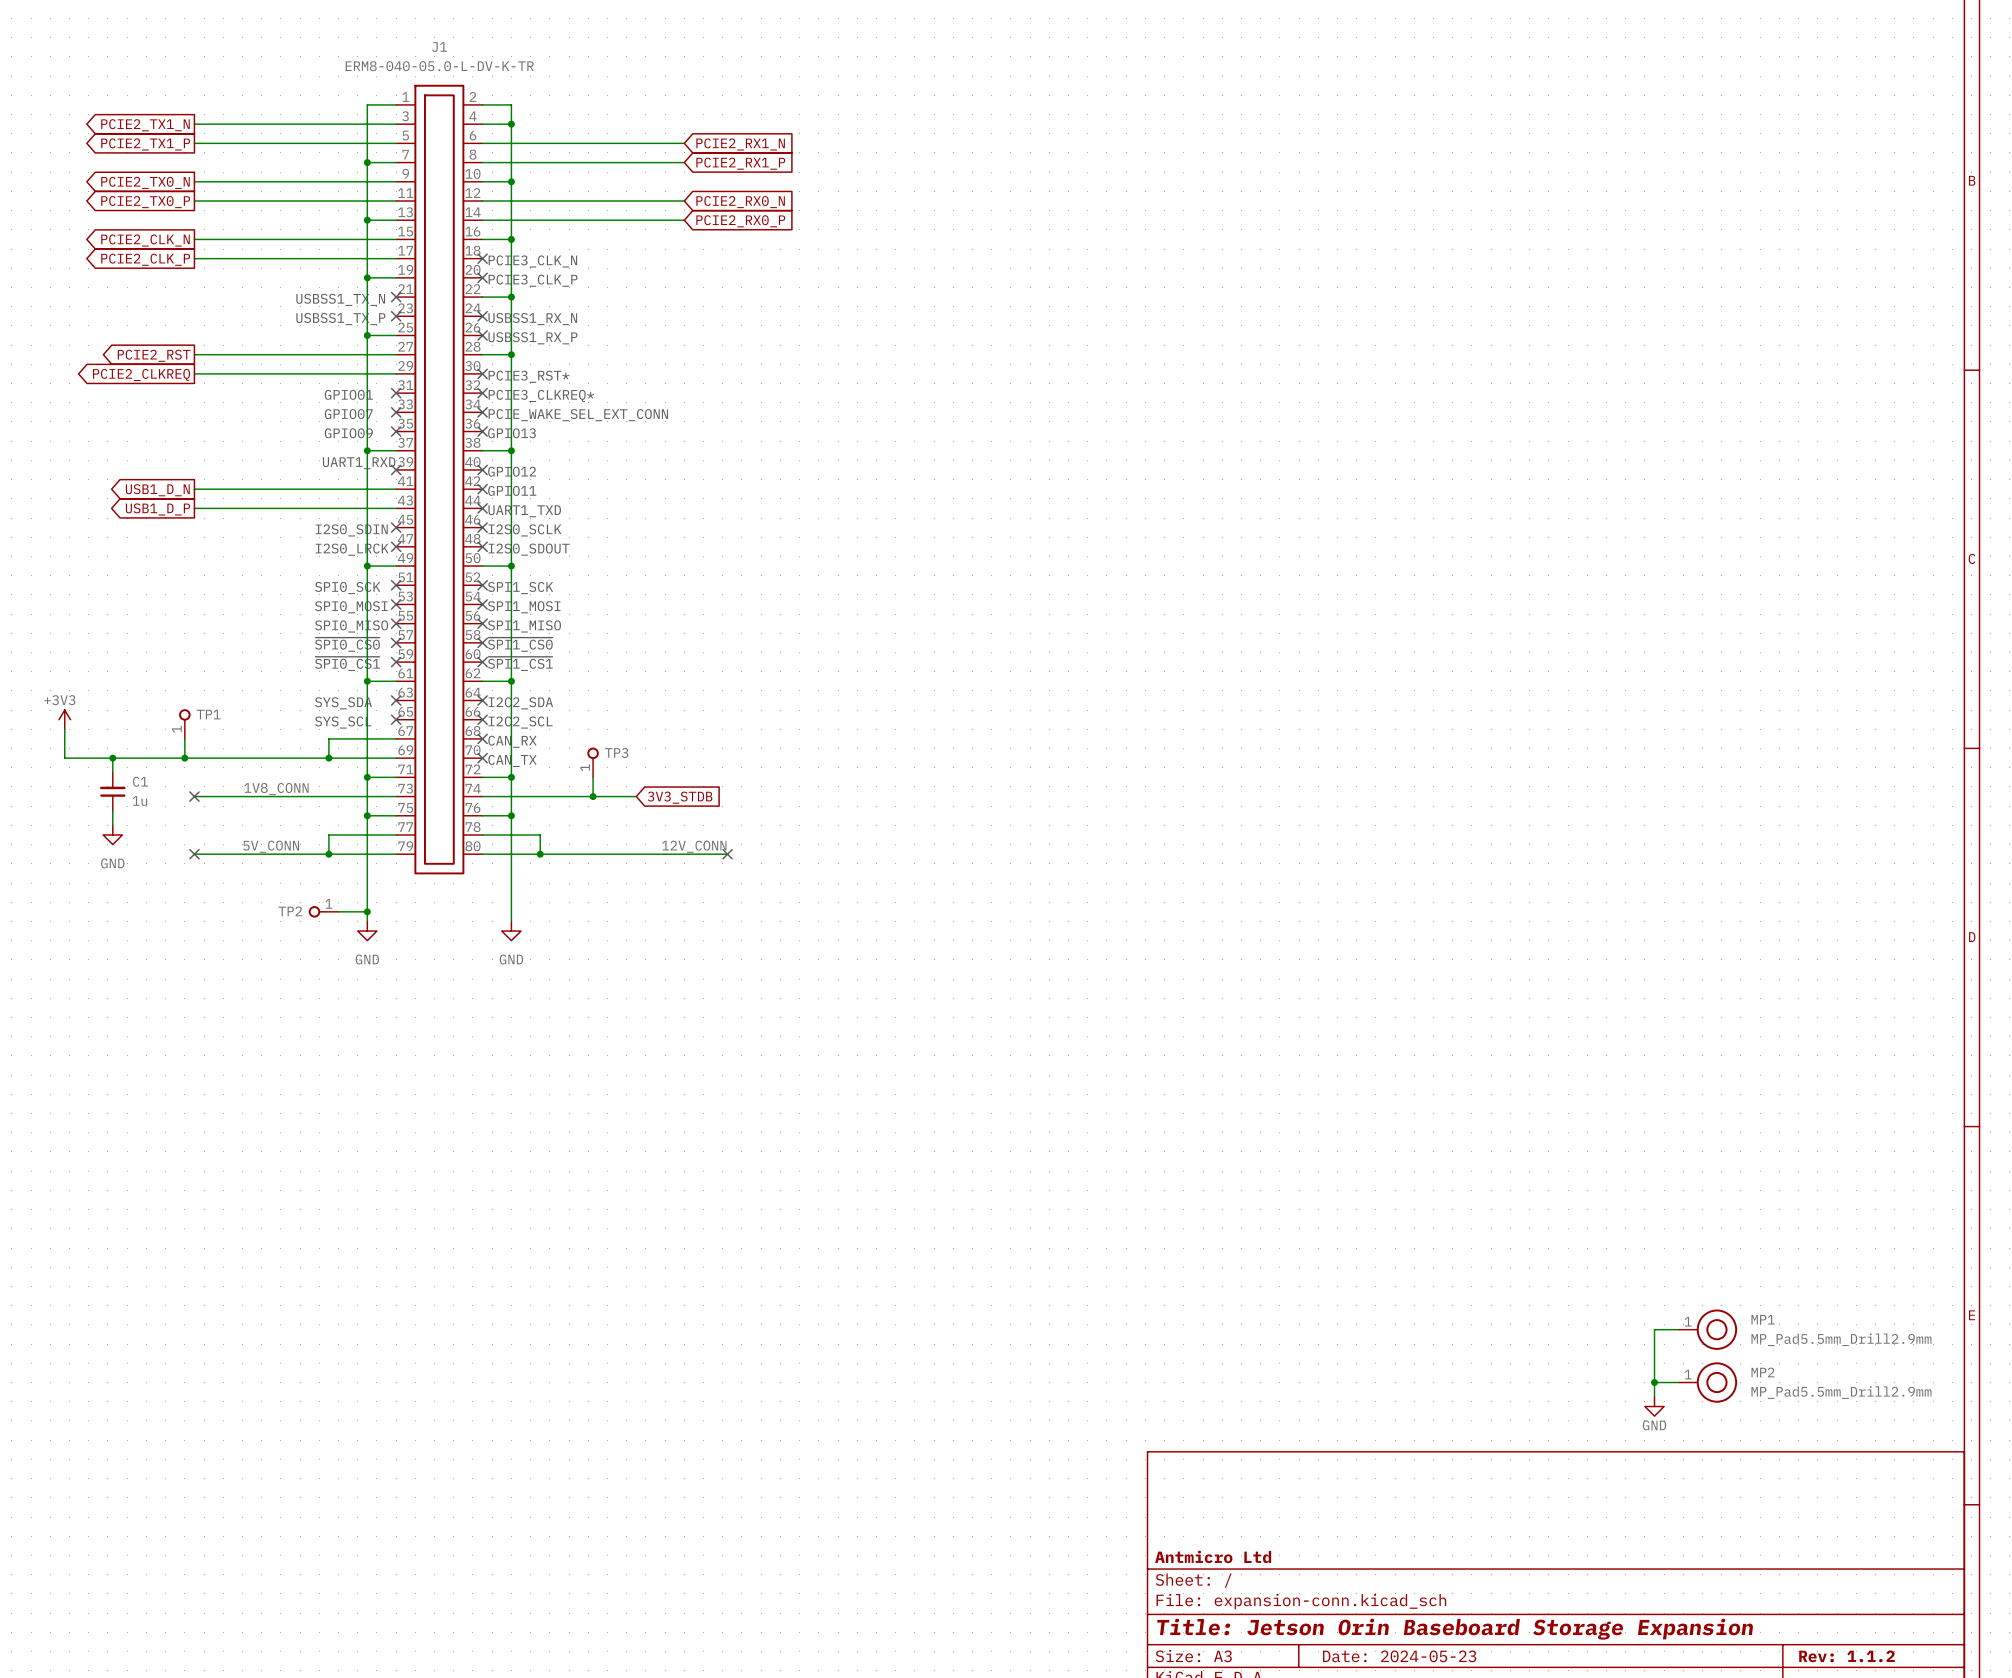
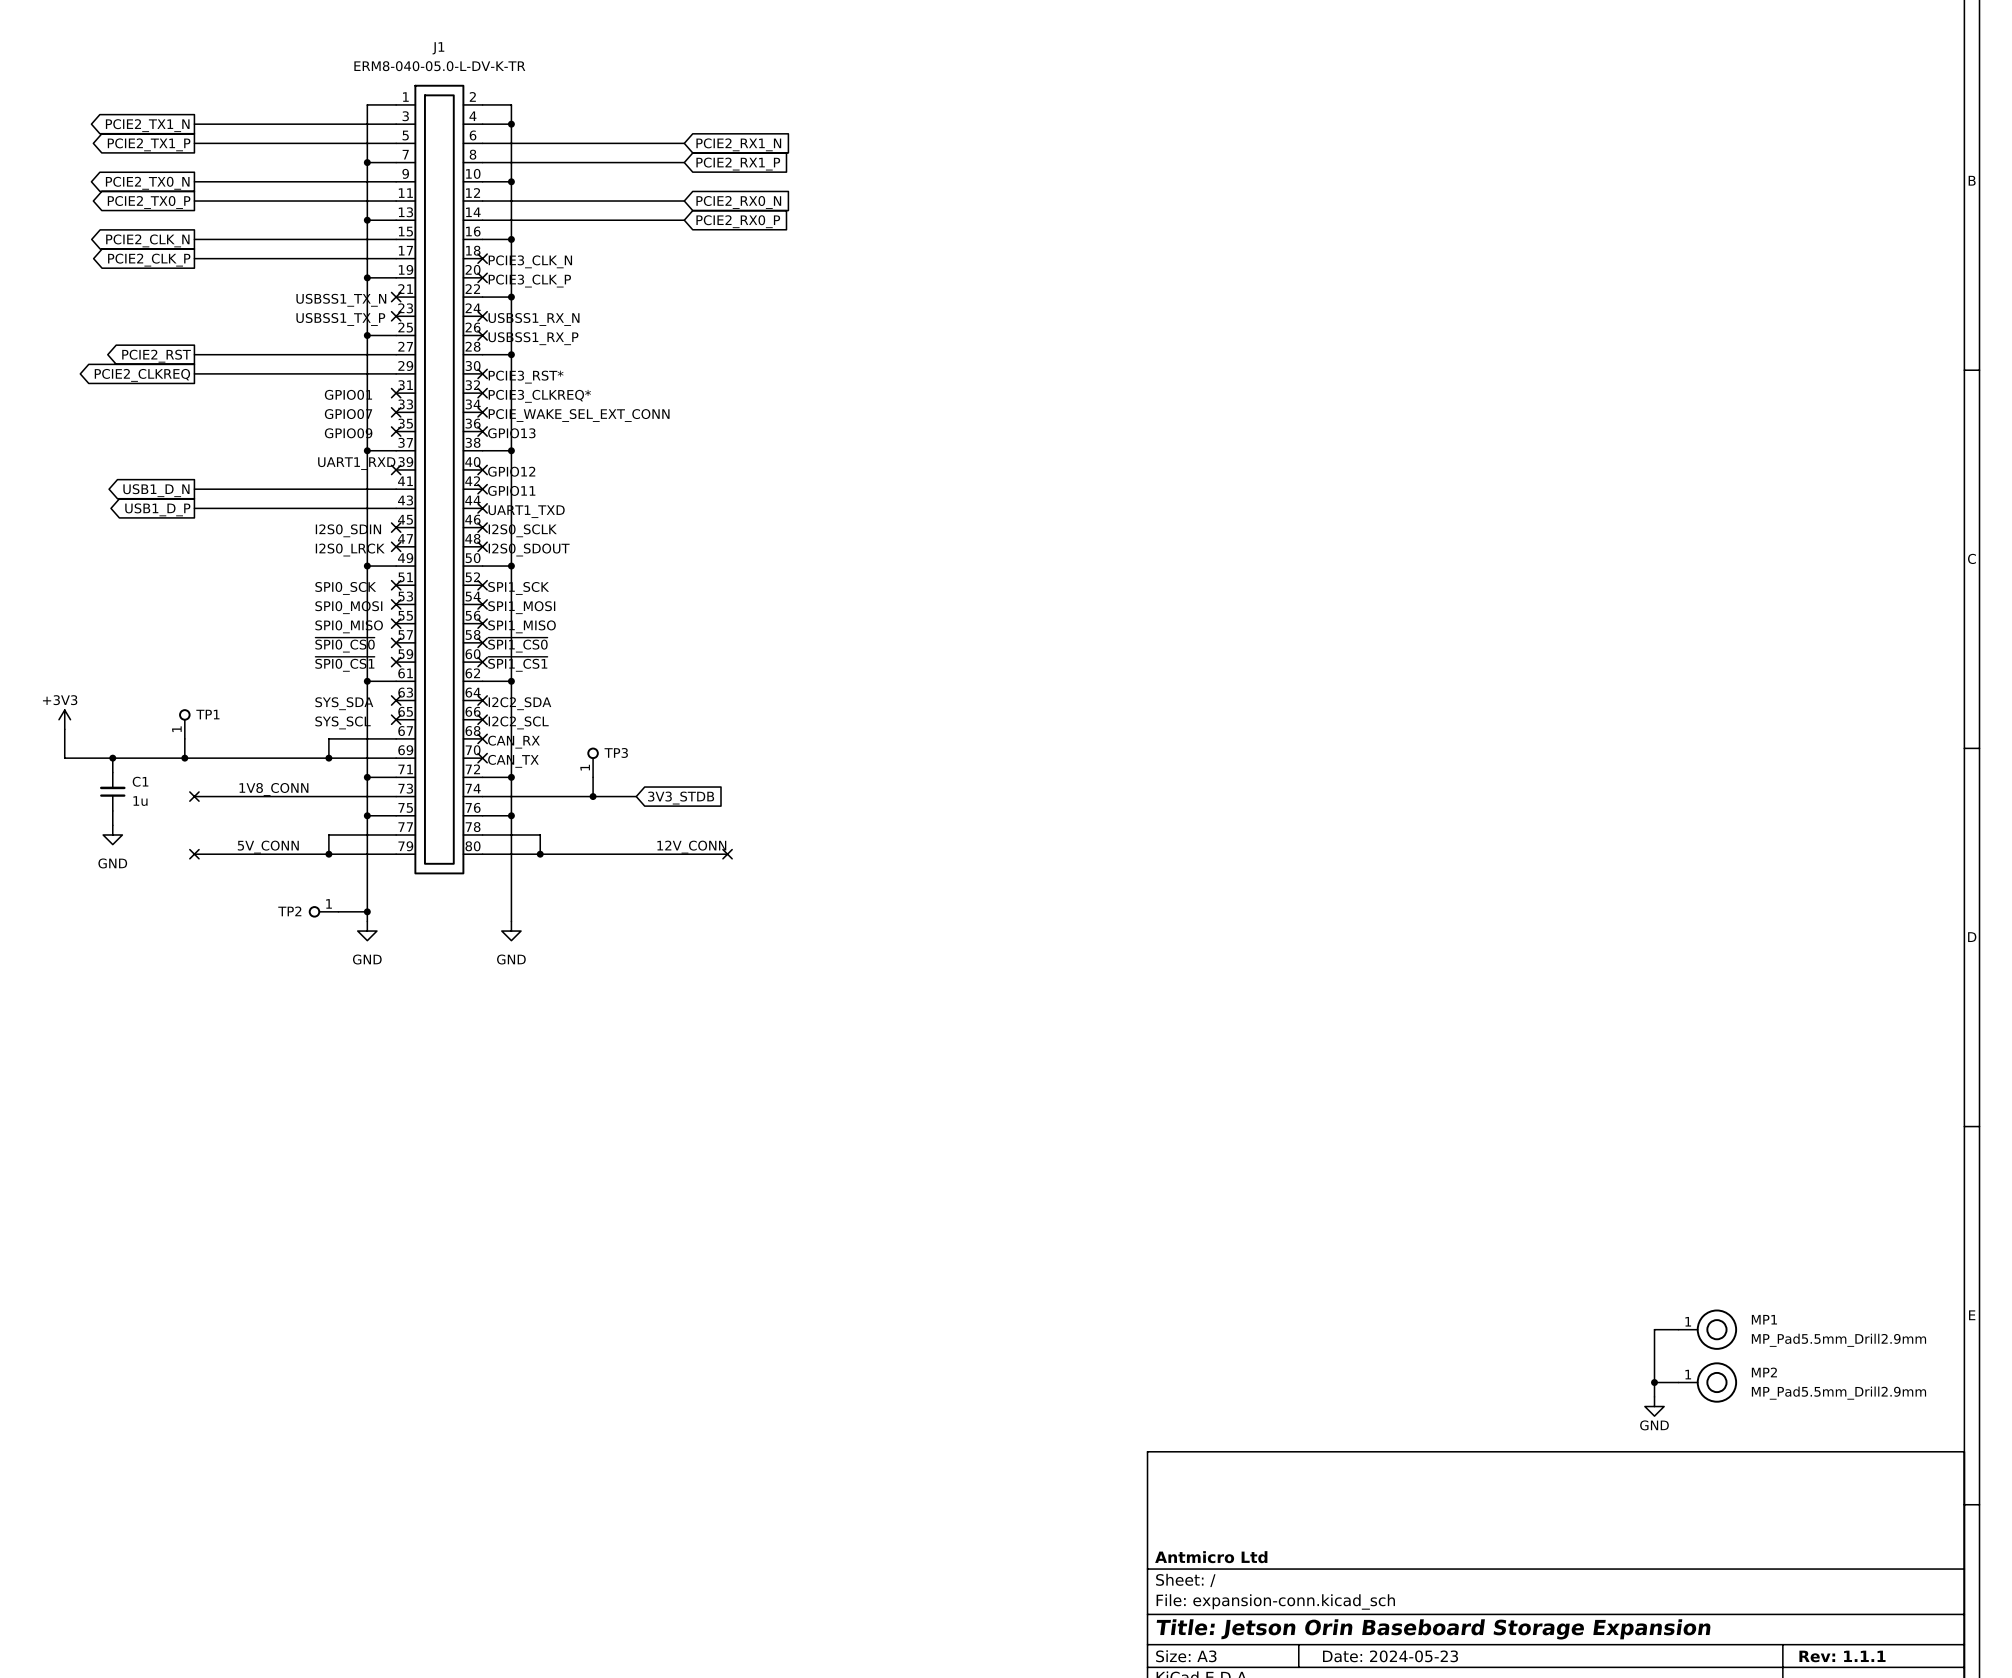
title block: Rev: 1.1.2 (1847, 1656) -> Rev: 1.1.1 (1842, 1656)

